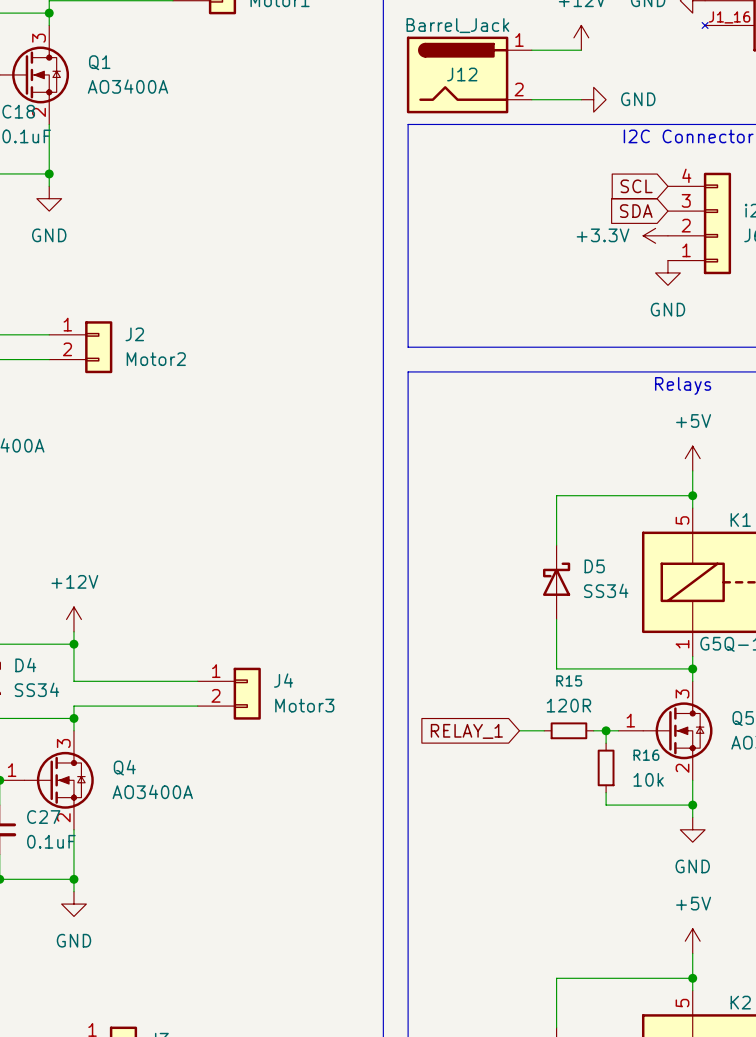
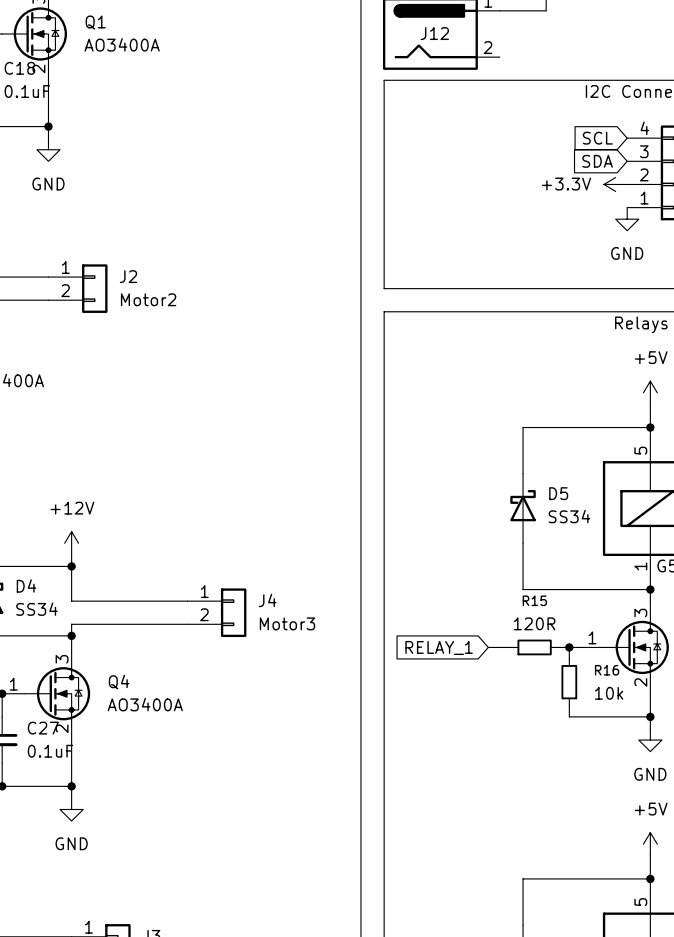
wire: (531, 99) (581, 99) -> none
power symbol: GND (593, 99) -> none

